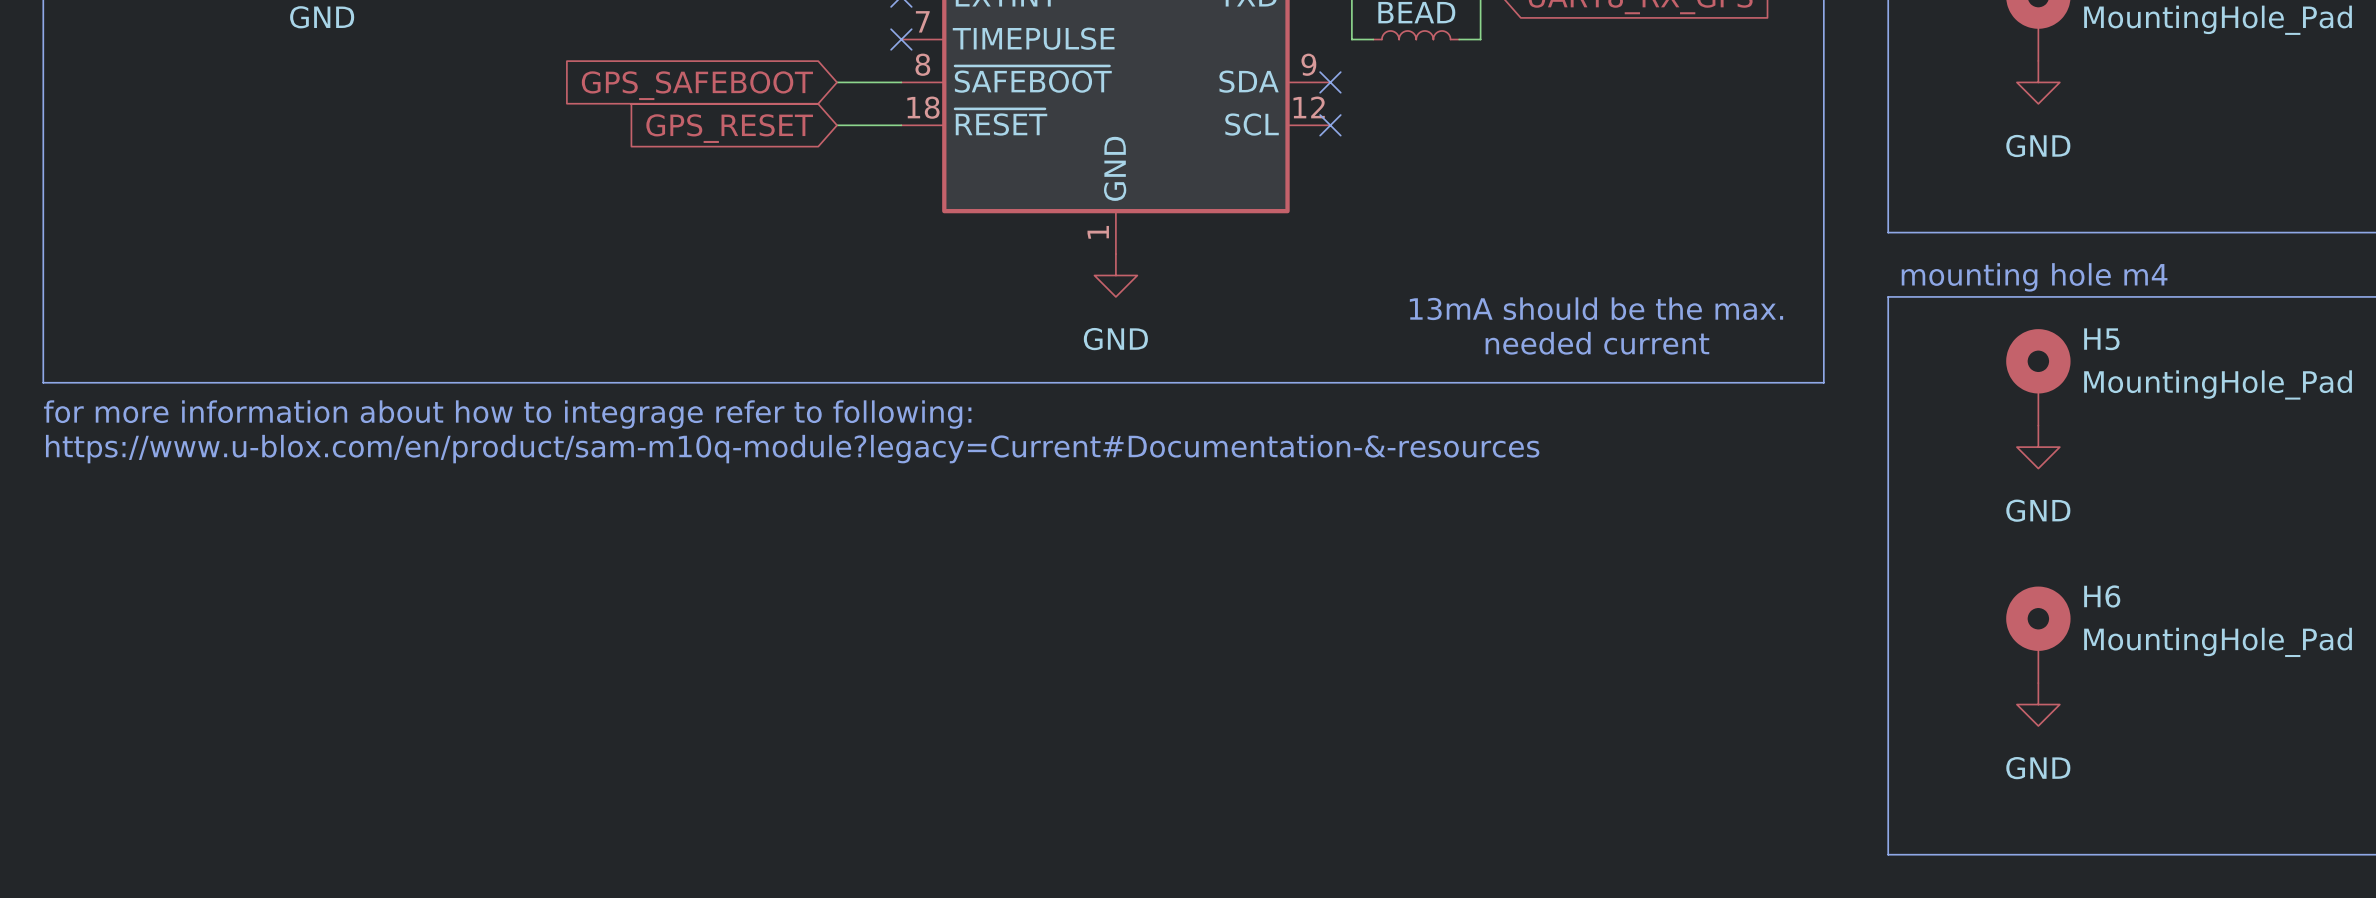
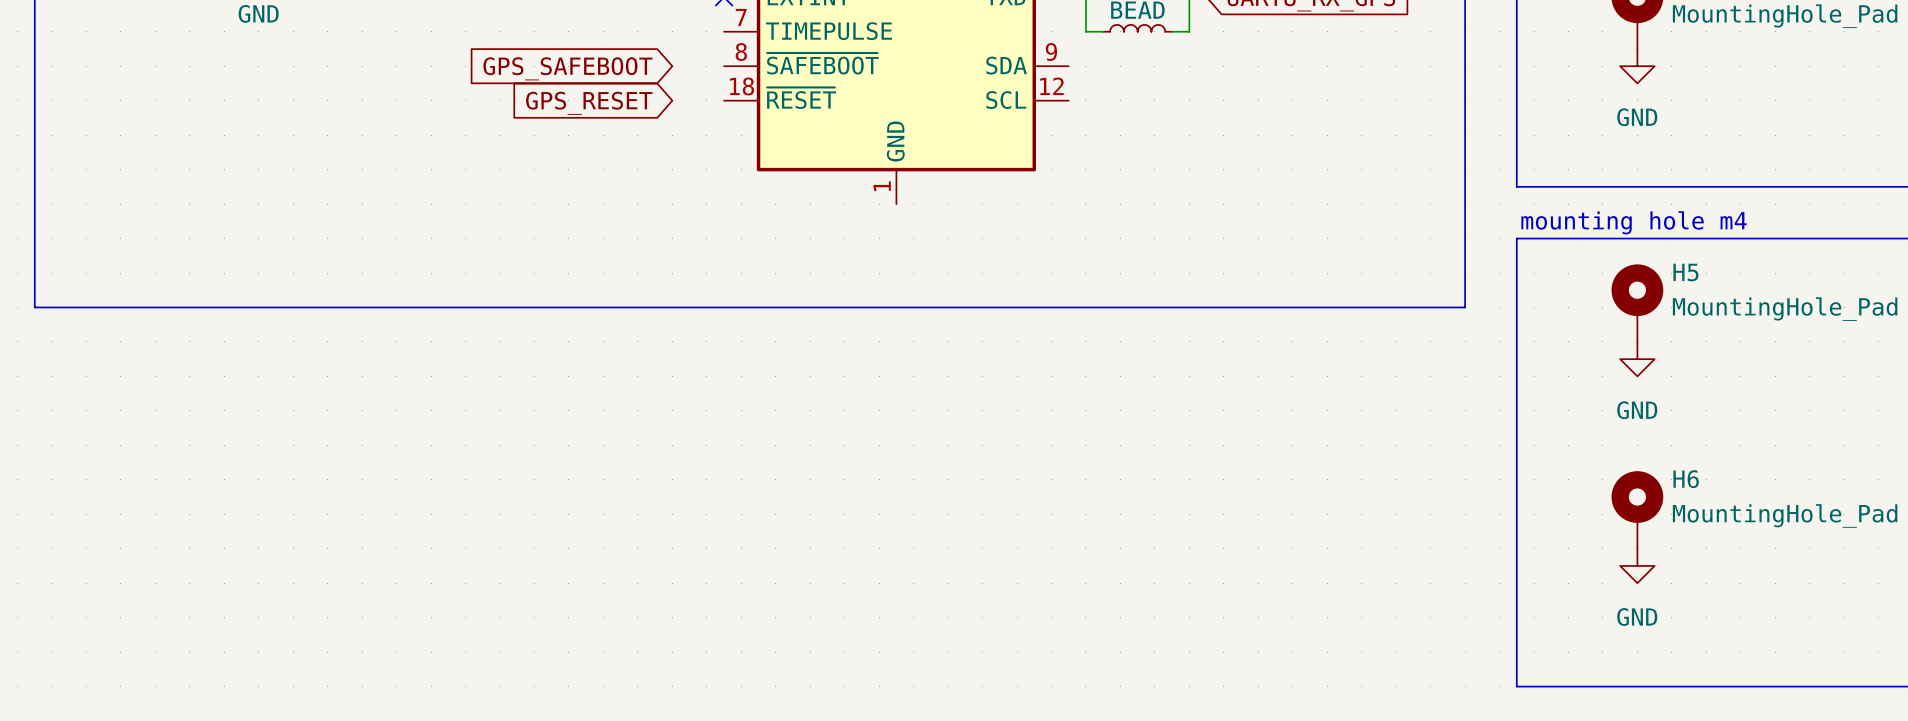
no-connect mark: (901, 39) -> none
wire: (837, 82) (901, 82) -> none
no-connect mark: (1330, 82) -> none
wire: (837, 125) (901, 125) -> none
no-connect mark: (1330, 125) -> none
power symbol: GND (1115, 275) -> none
text: 13mA should be the max. (1596, 308) -> none
text: needed current (1597, 343) -> none
text: for more information about how to integrage refer to following: (507, 414) -> none
text: https://www.u-blox.com/en/product/sam-m10q-module?legacy=Current#Documentation-&-resources (792, 449) -> none

